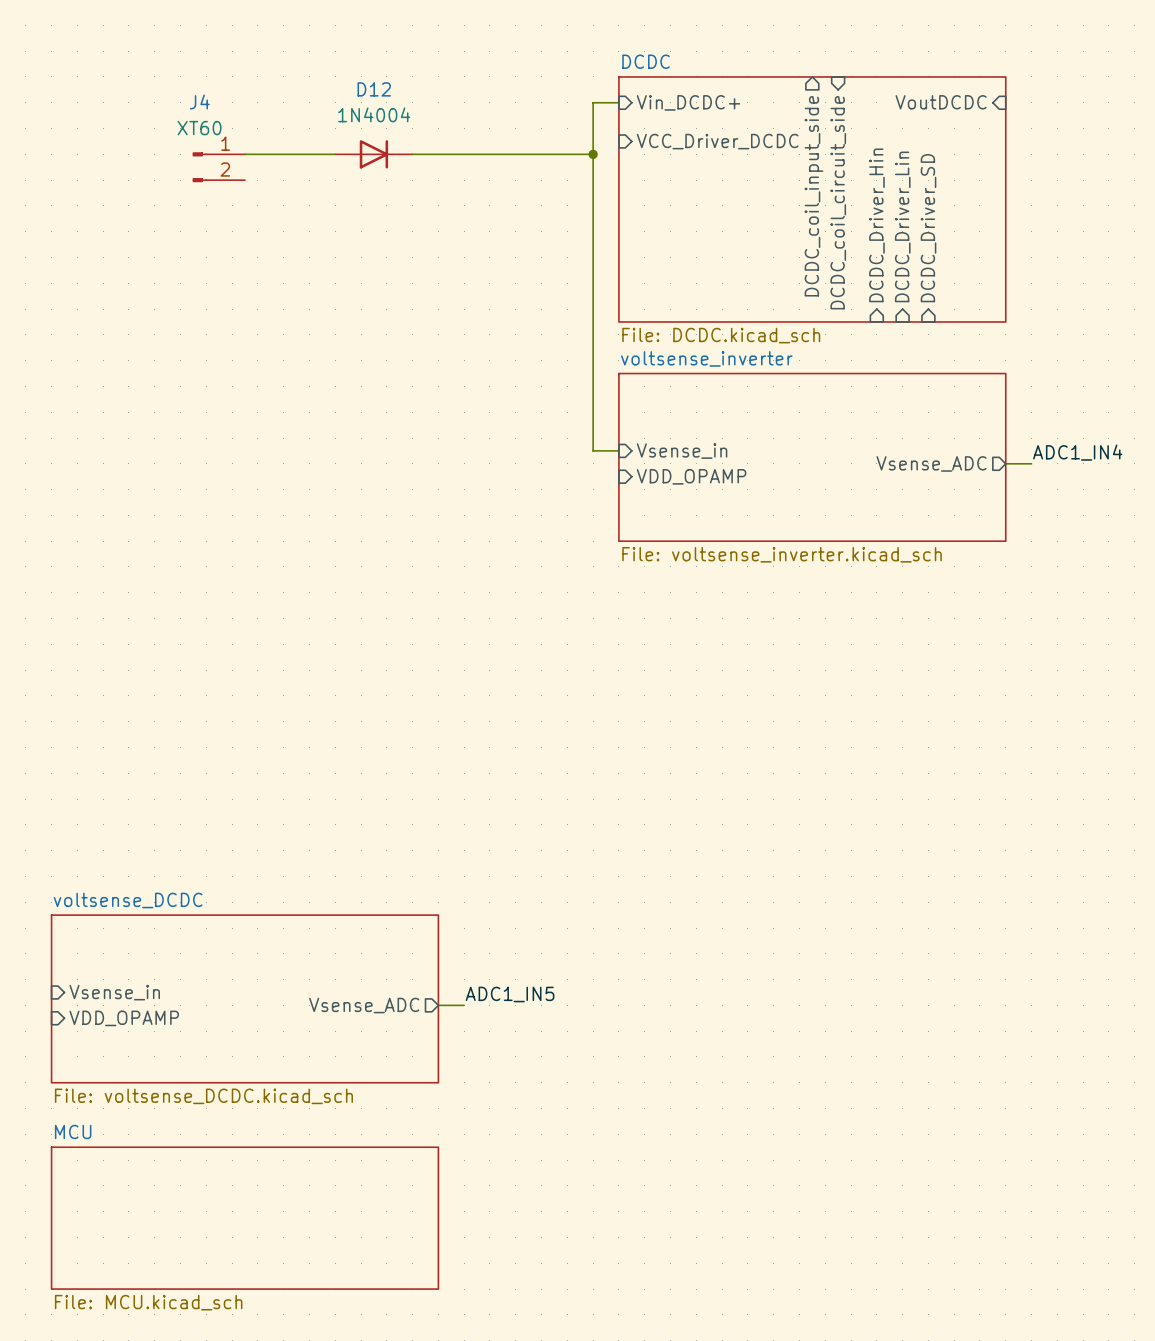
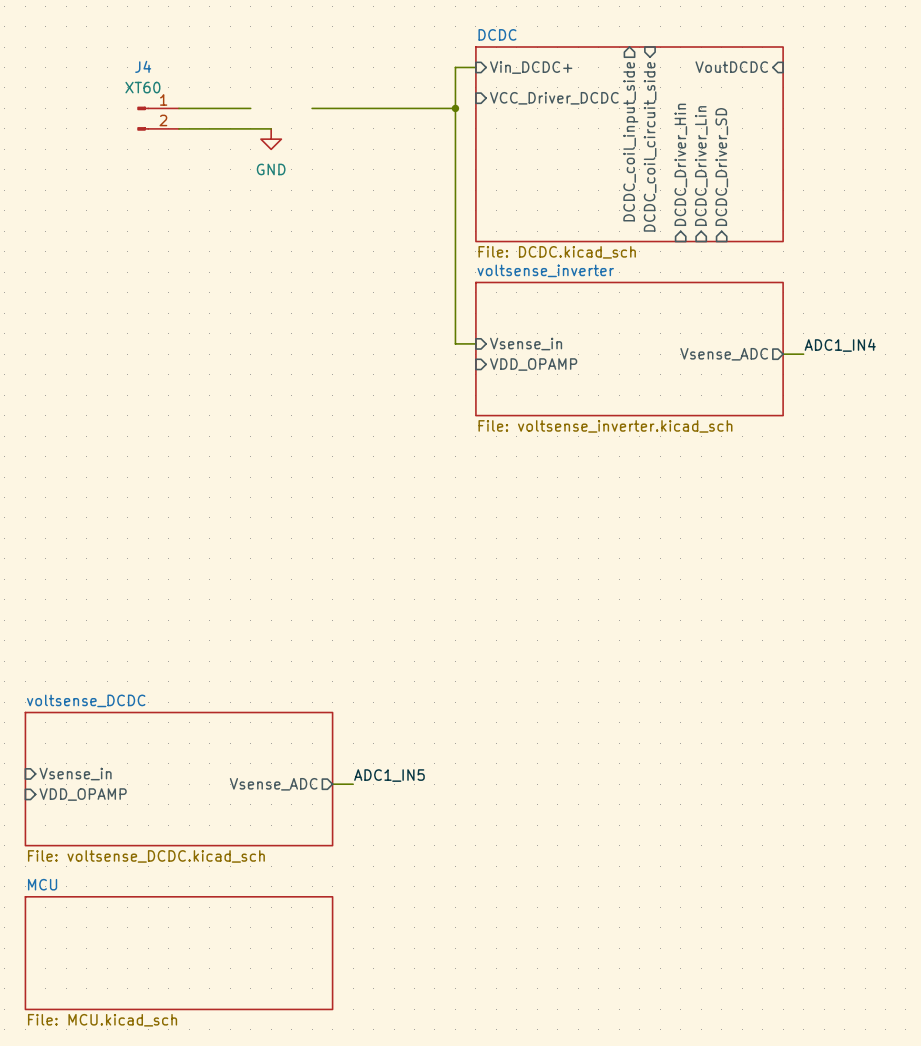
D12: 1N4004 (373, 154) -> none
wire: none -> (179, 128) (271, 128)
power symbol: none -> GND (271, 139)

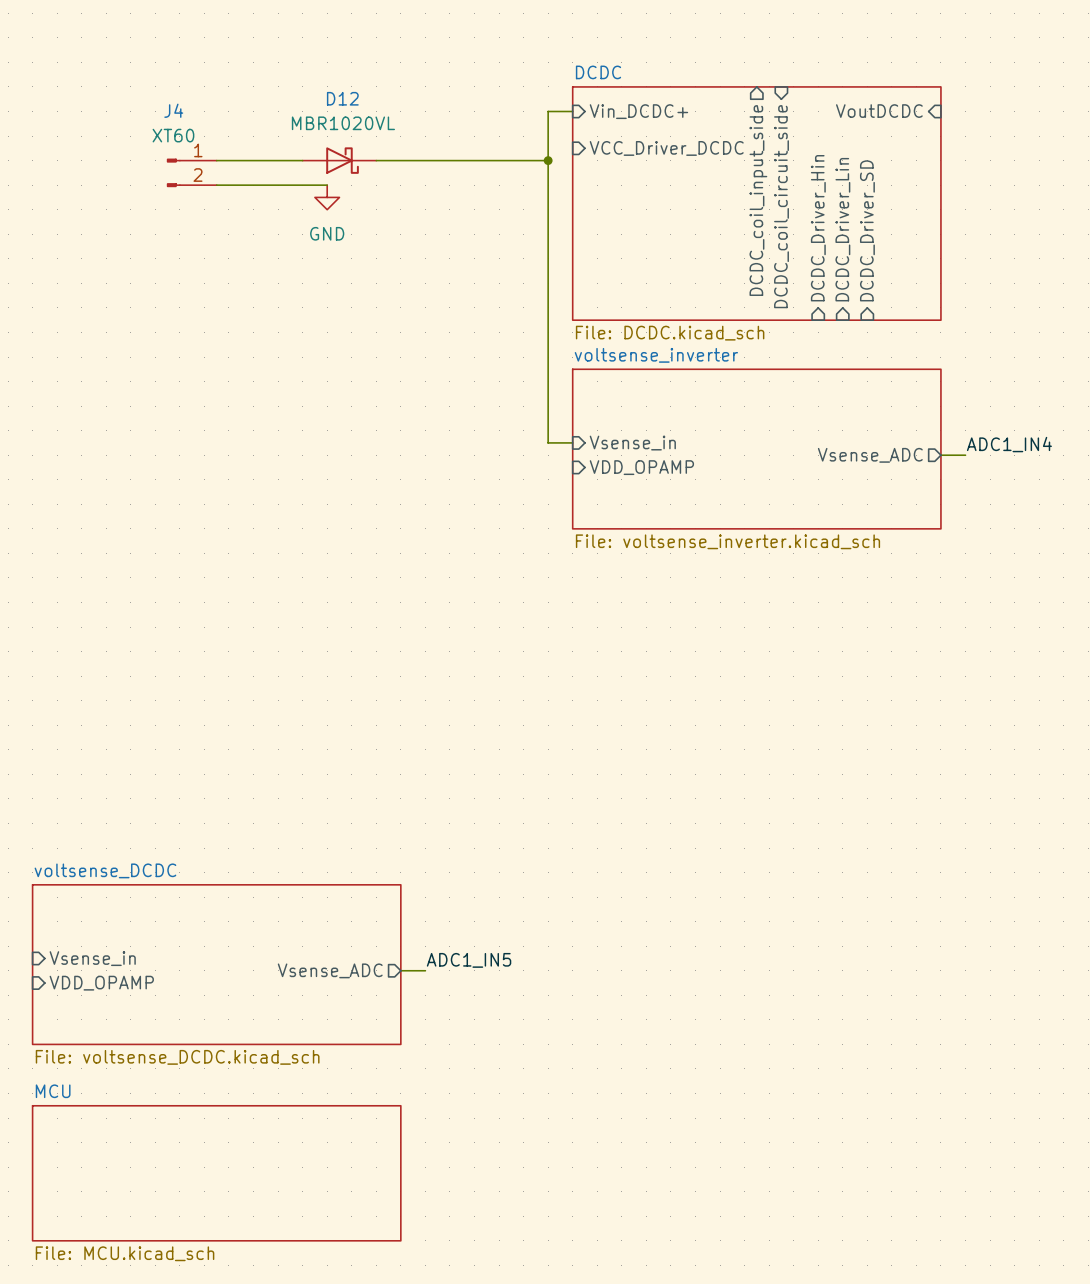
D12: none -> MBR1020VL (339, 160)

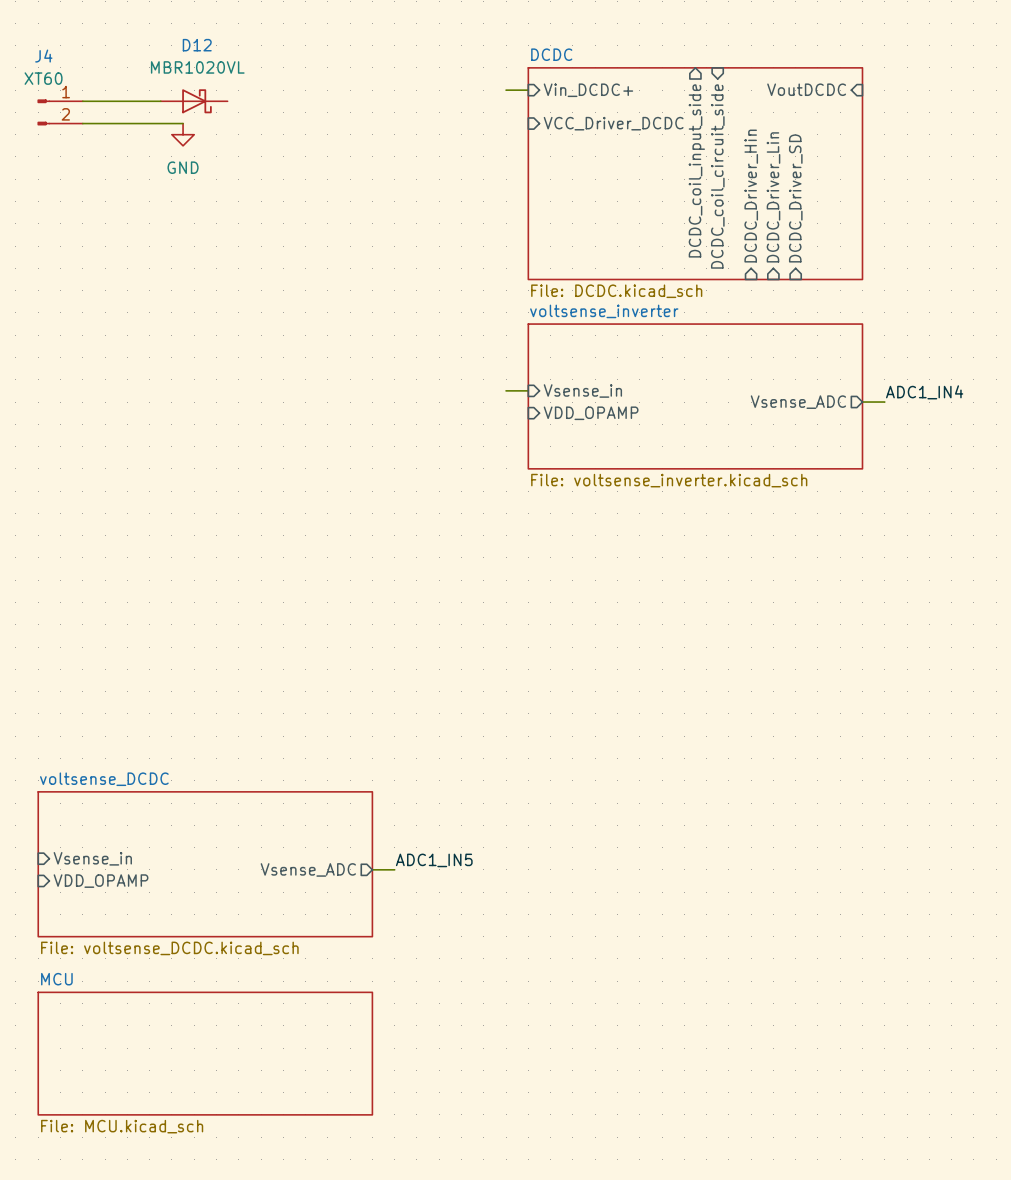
wire: (548, 111) (548, 442) -> none
wire: (216, 160) (302, 160) -> (82, 101) (160, 101)
D12 position: (339, 160) -> (194, 101)
wire: (376, 160) (548, 160) -> none
junction: (548, 160) -> none
J4 position: (191, 172) -> (60, 112)
wire: (216, 185) (327, 185) -> (82, 123) (183, 123)
power symbol position: GND (327, 197) -> GND (183, 134)

